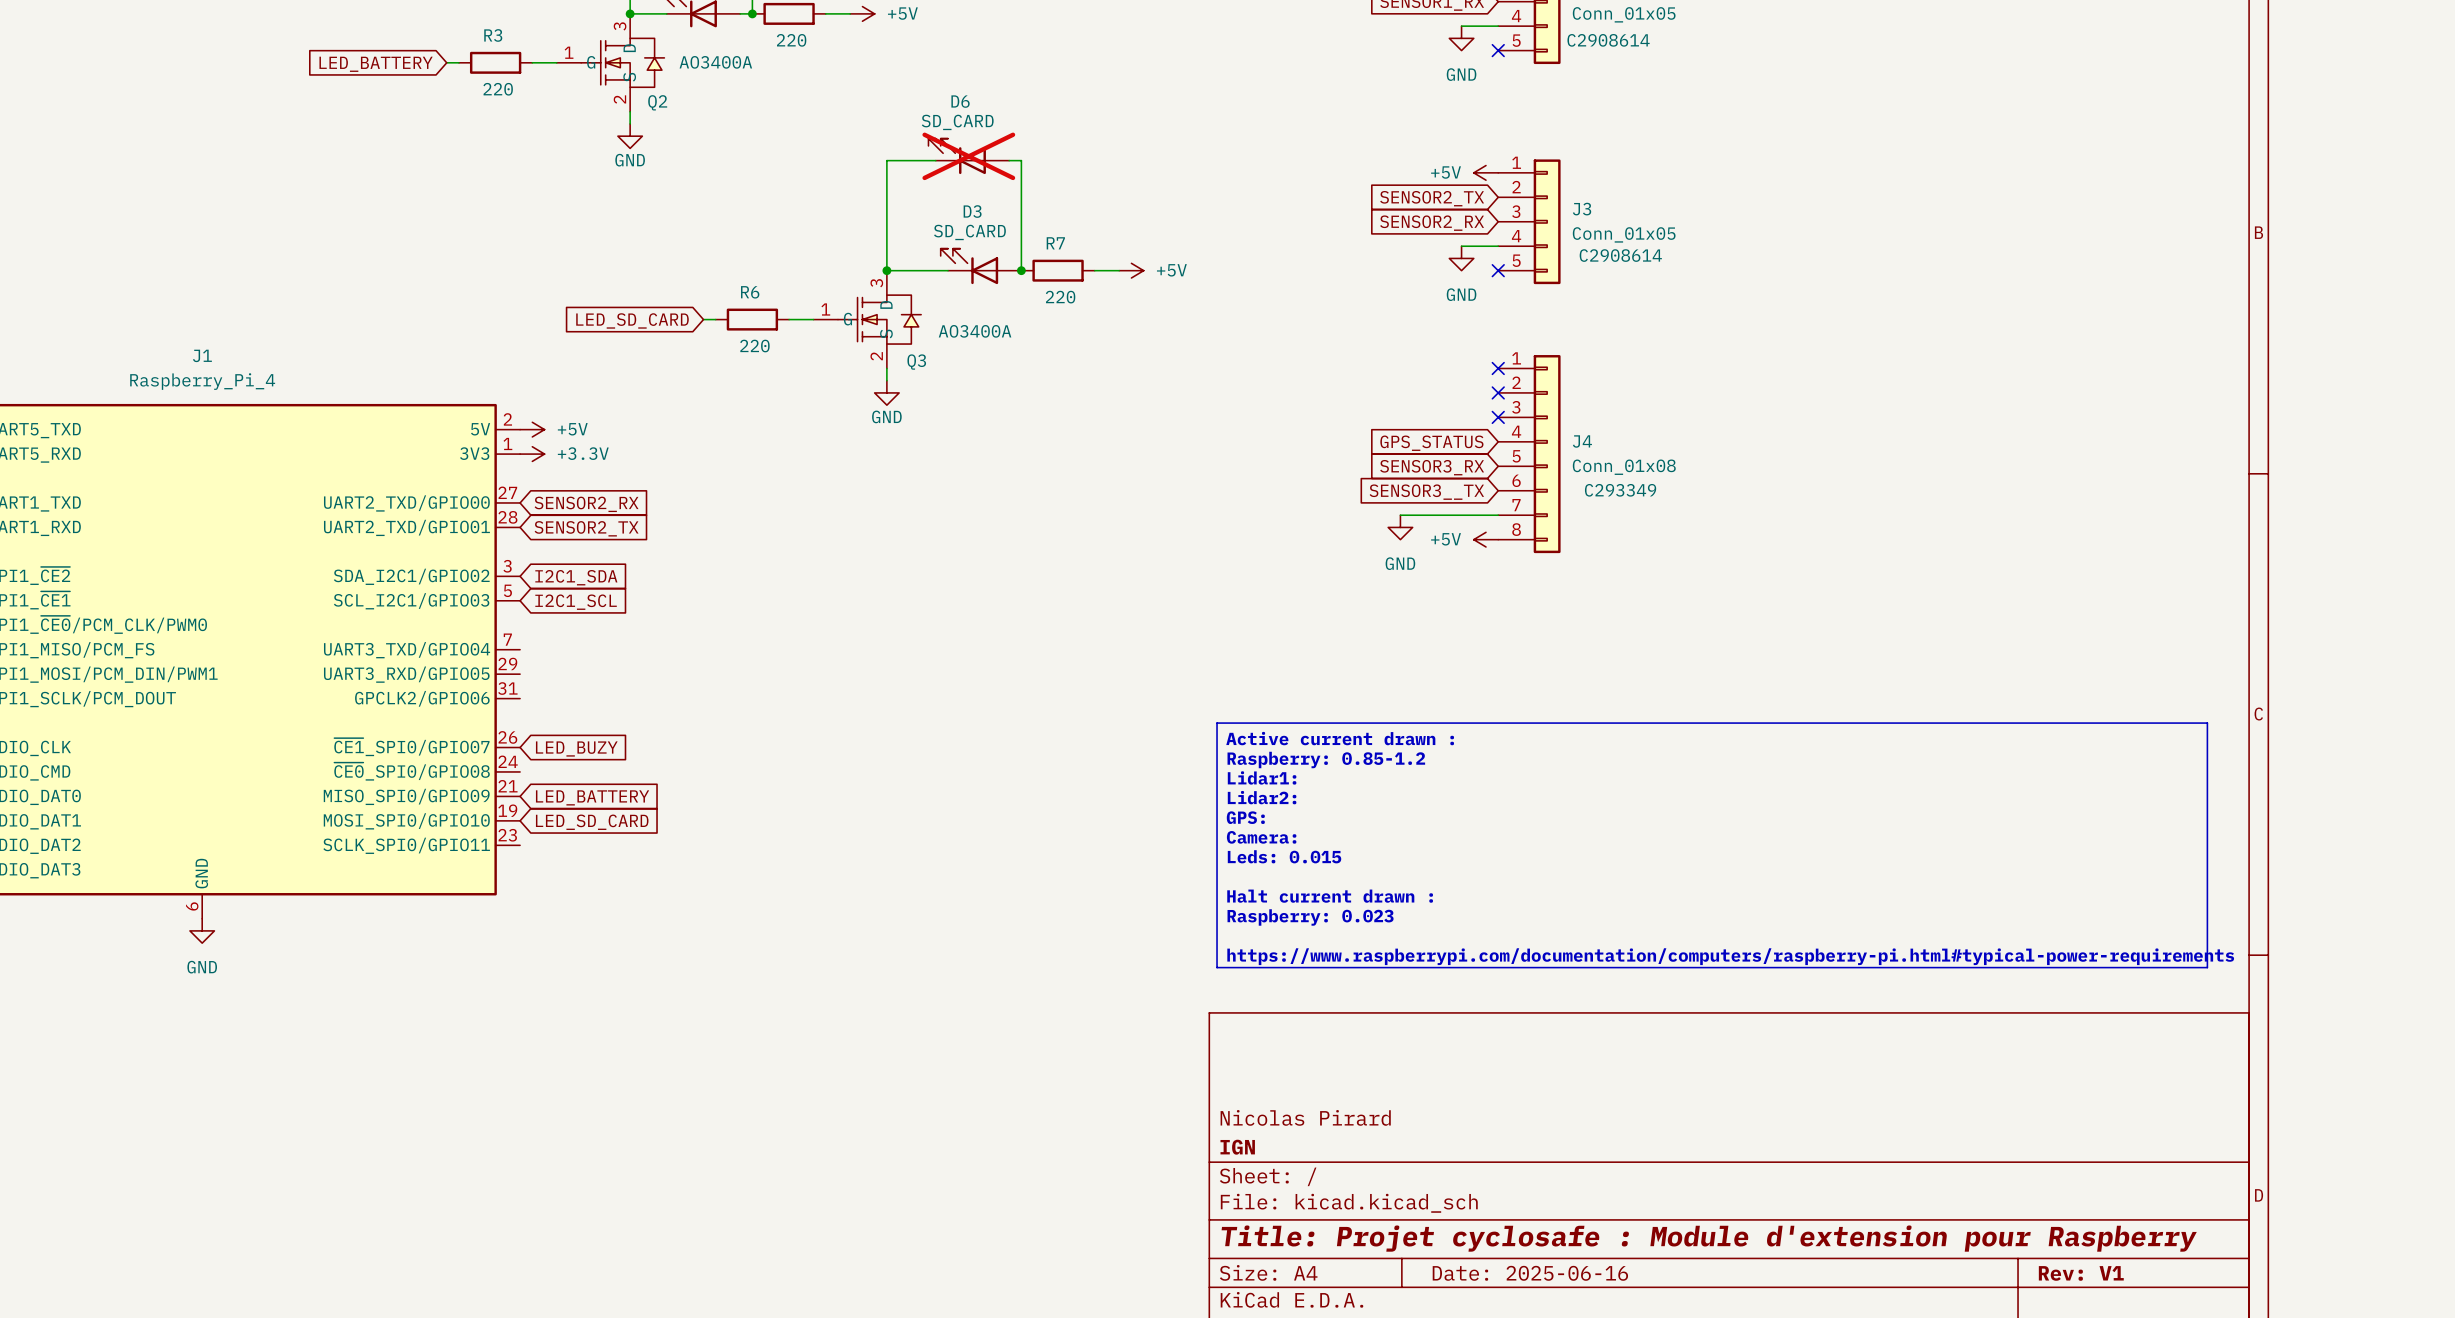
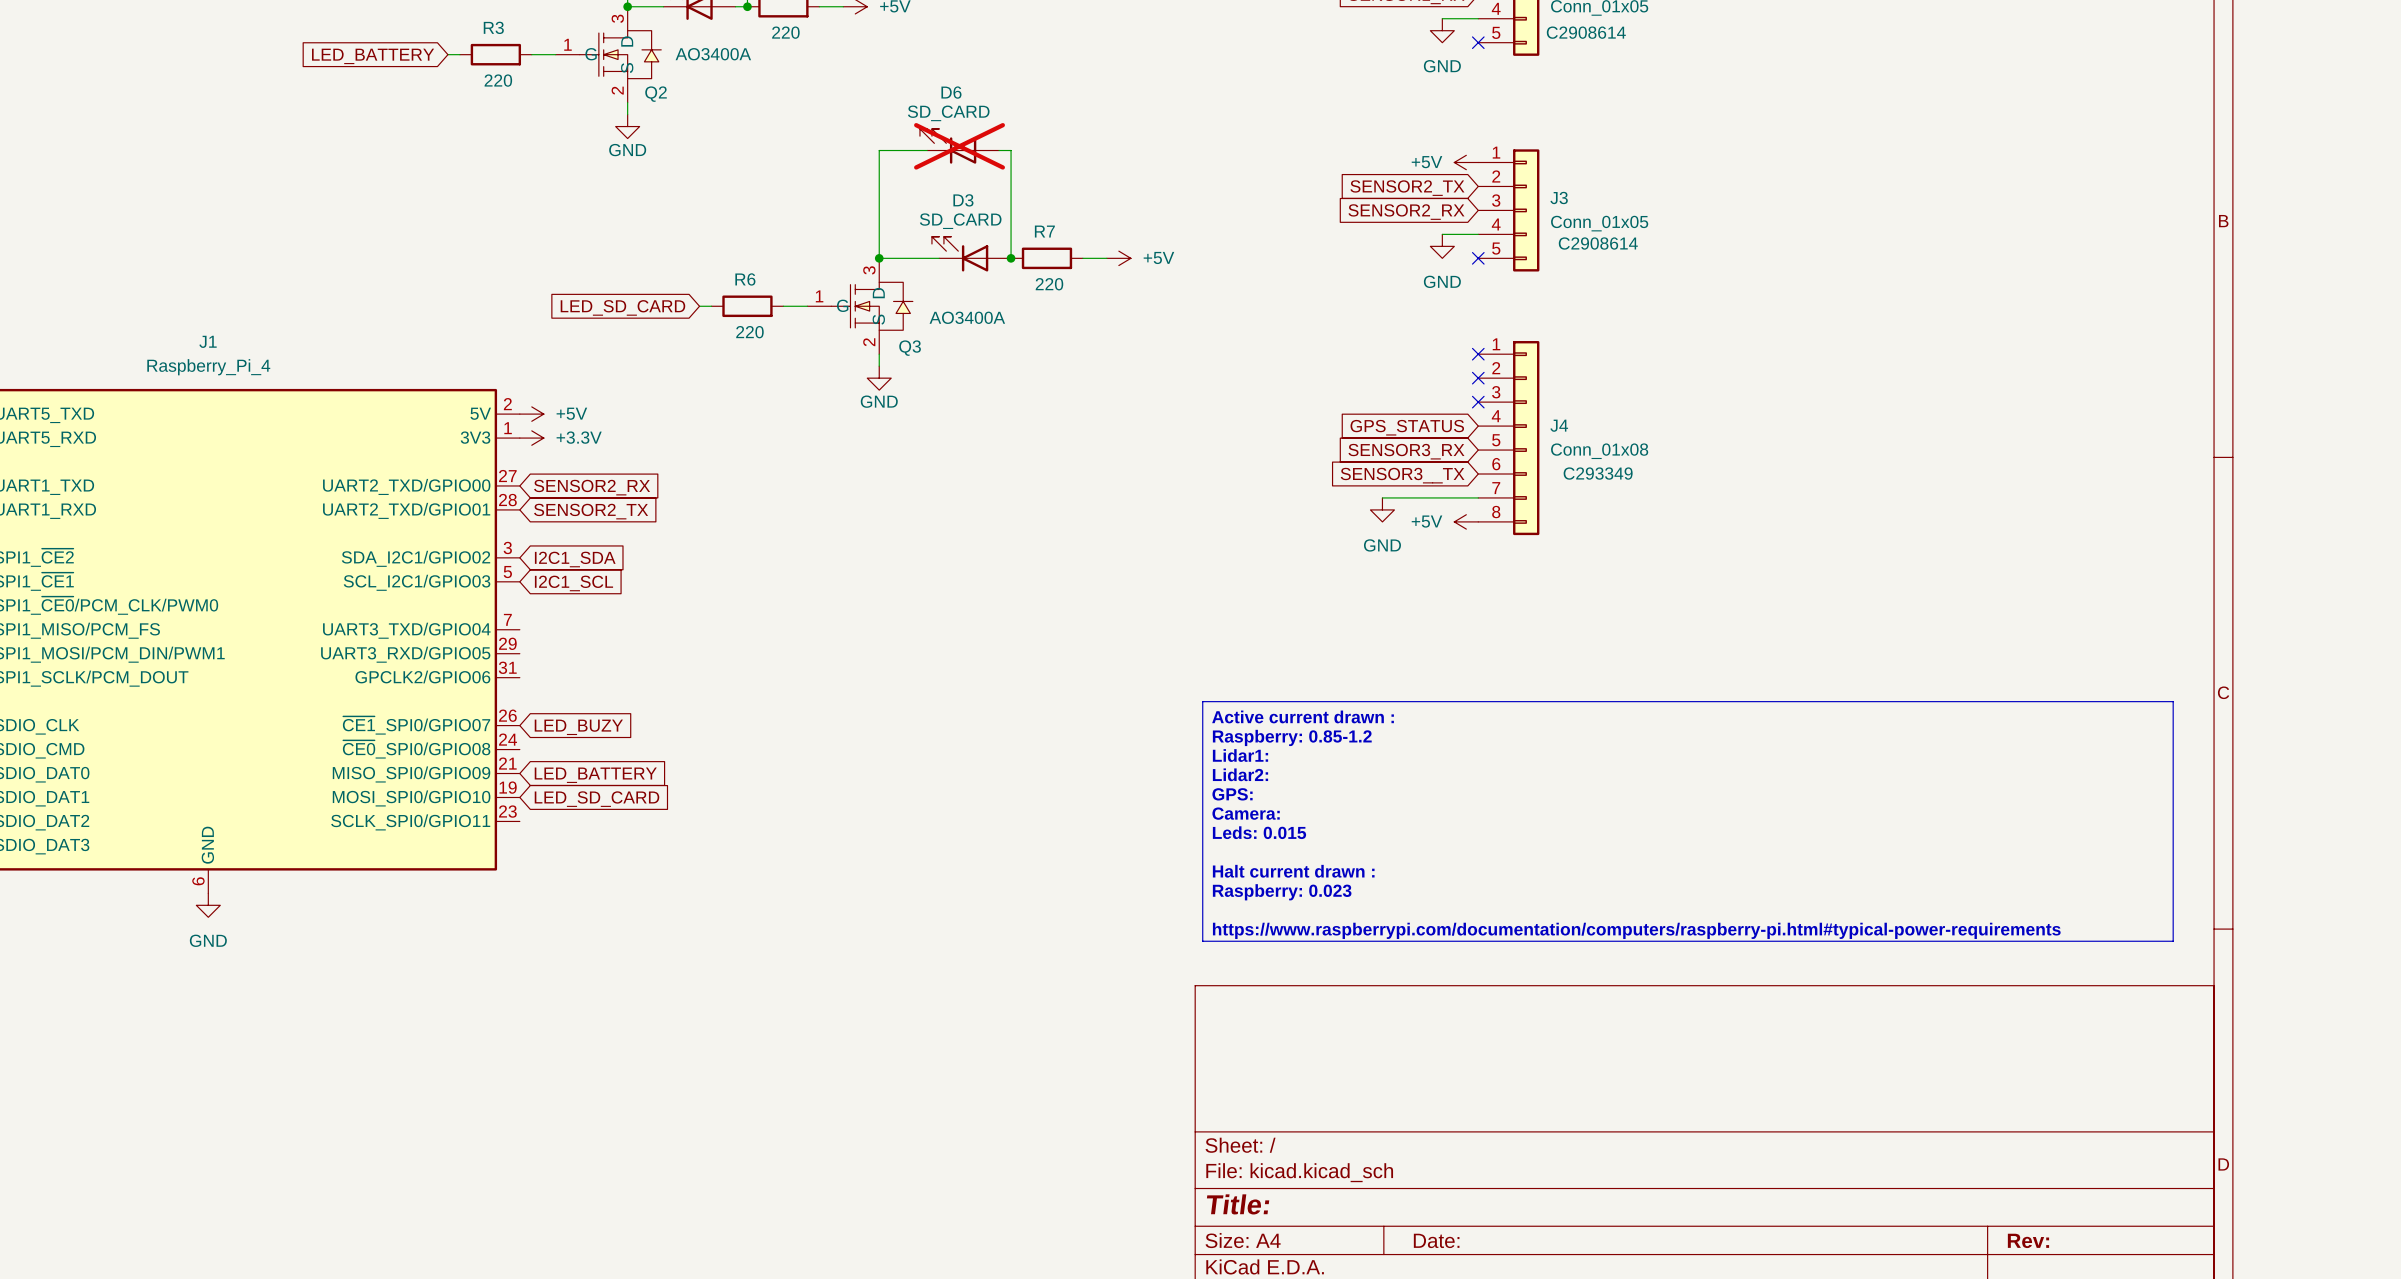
title block: Nicolas Pirard (1305, 1117) -> none
title block: IGN (1237, 1147) -> none
title block: Title: Projet cyclosafe : Module d'extension pour Raspberry (1709, 1238) -> Title: (1238, 1204)
title block: Date: 2025-06-16 (1530, 1273) -> Date: (1436, 1240)
title block: Rev: V1 (2081, 1273) -> Rev: (2028, 1240)

